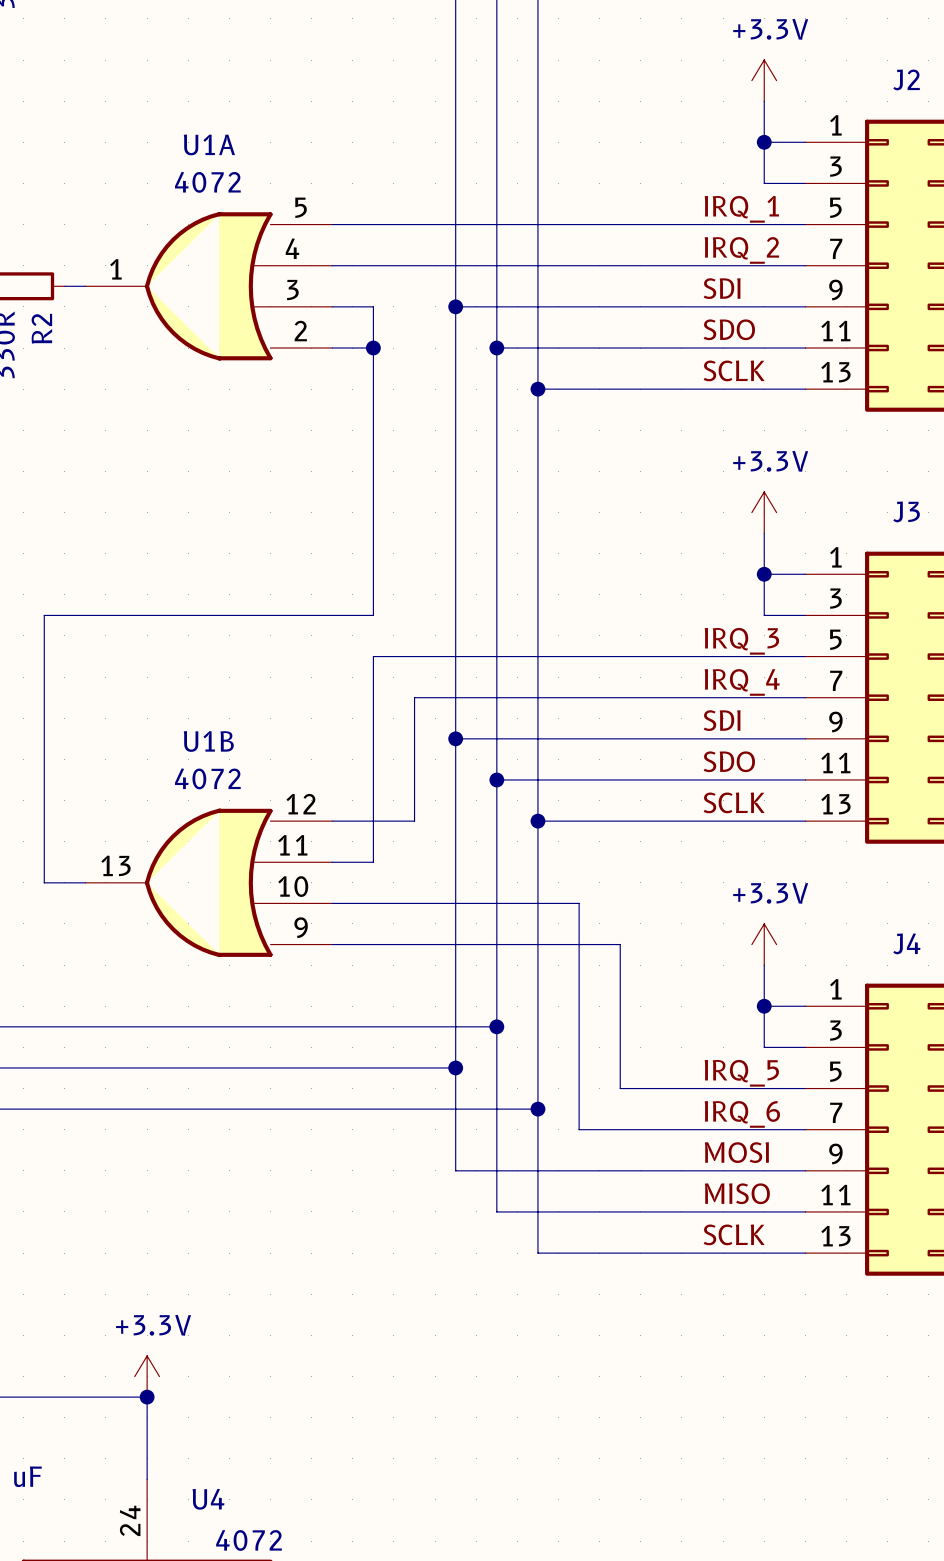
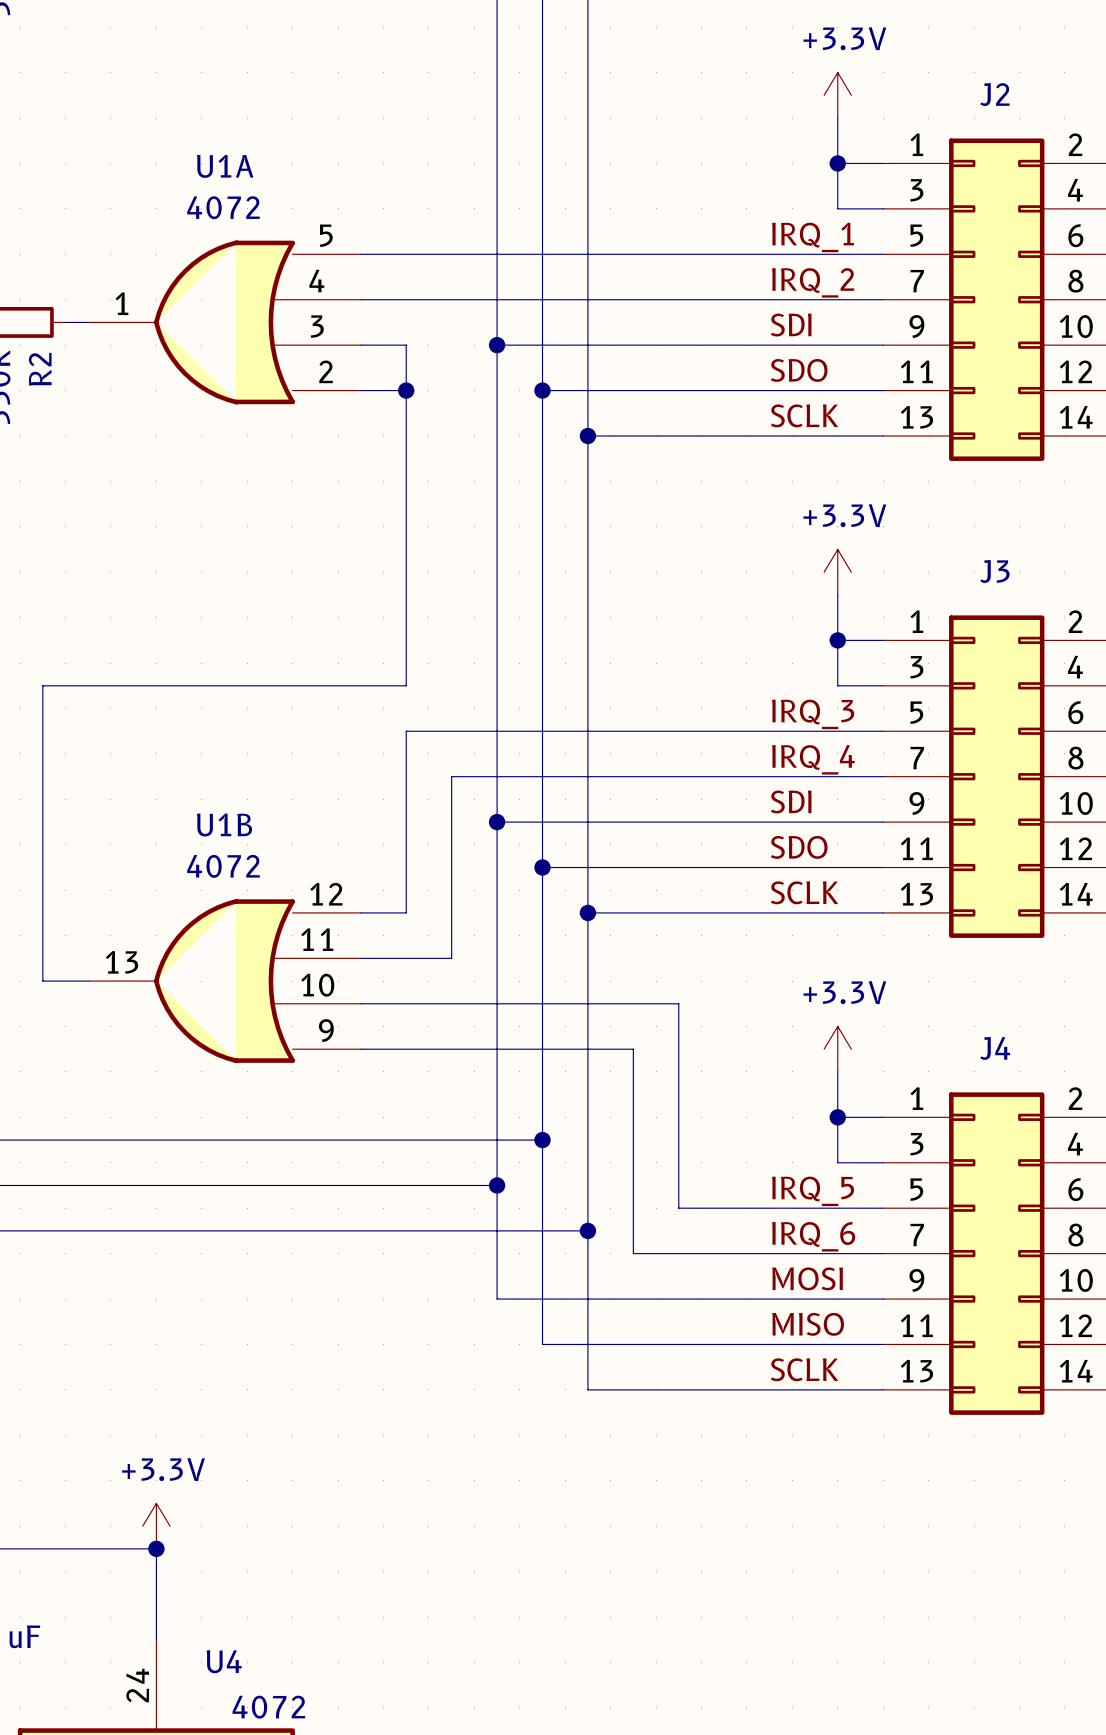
wire: (414, 821) (373, 821) (373, 862) -> (451, 912) (451, 958) (406, 958)
wire: (579, 903) (579, 944) (620, 944) -> (633, 1003) (678, 1003) (678, 1049)

